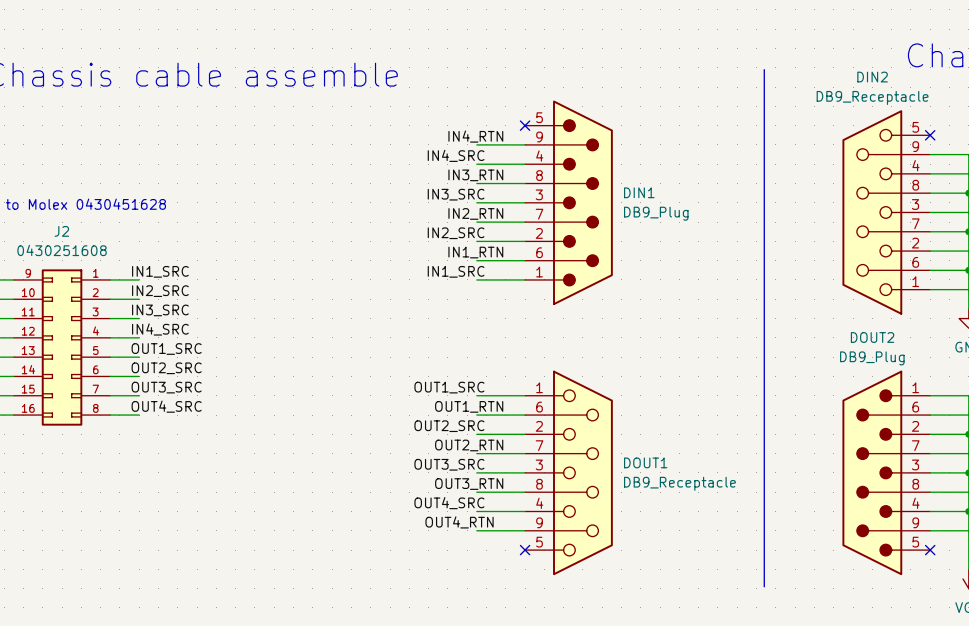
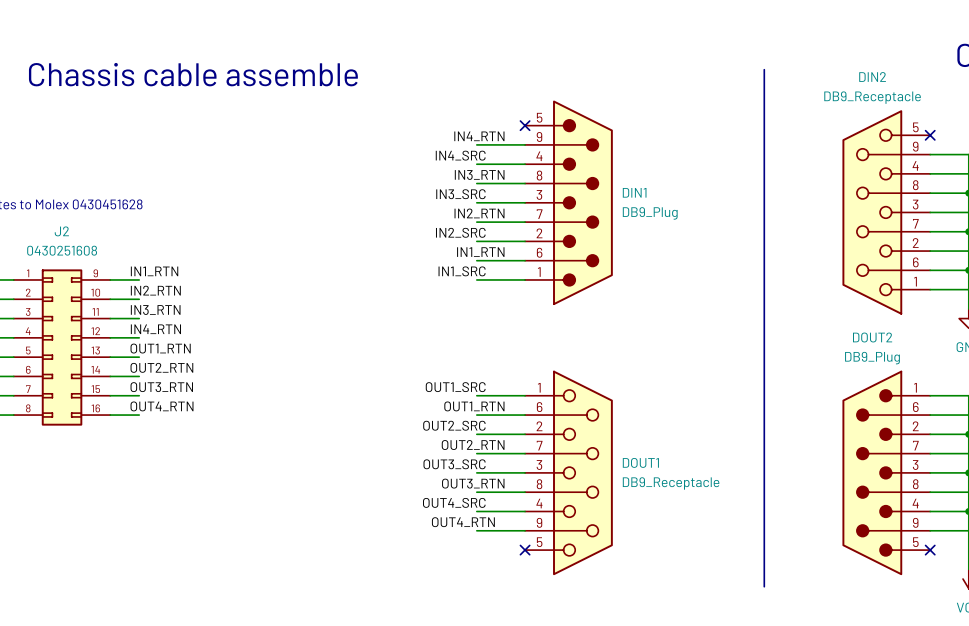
label: IN1_SRC (160, 271) -> IN1_RTN (154, 271)
label: IN2_SRC (160, 291) -> IN2_RTN (155, 290)
label: IN3_SRC (160, 310) -> IN3_RTN (155, 310)
label: IN4_SRC (160, 329) -> IN4_RTN (155, 329)
J2 flip: as is (62, 347) -> left-right (62, 347)
label: OUT1_SRC (166, 349) -> OUT1_RTN (160, 348)
label: OUT2_SRC (166, 368) -> OUT2_RTN (161, 367)
label: OUT3_SRC (166, 387) -> OUT3_RTN (161, 387)
label: OUT4_SRC (166, 406) -> OUT4_RTN (162, 406)

